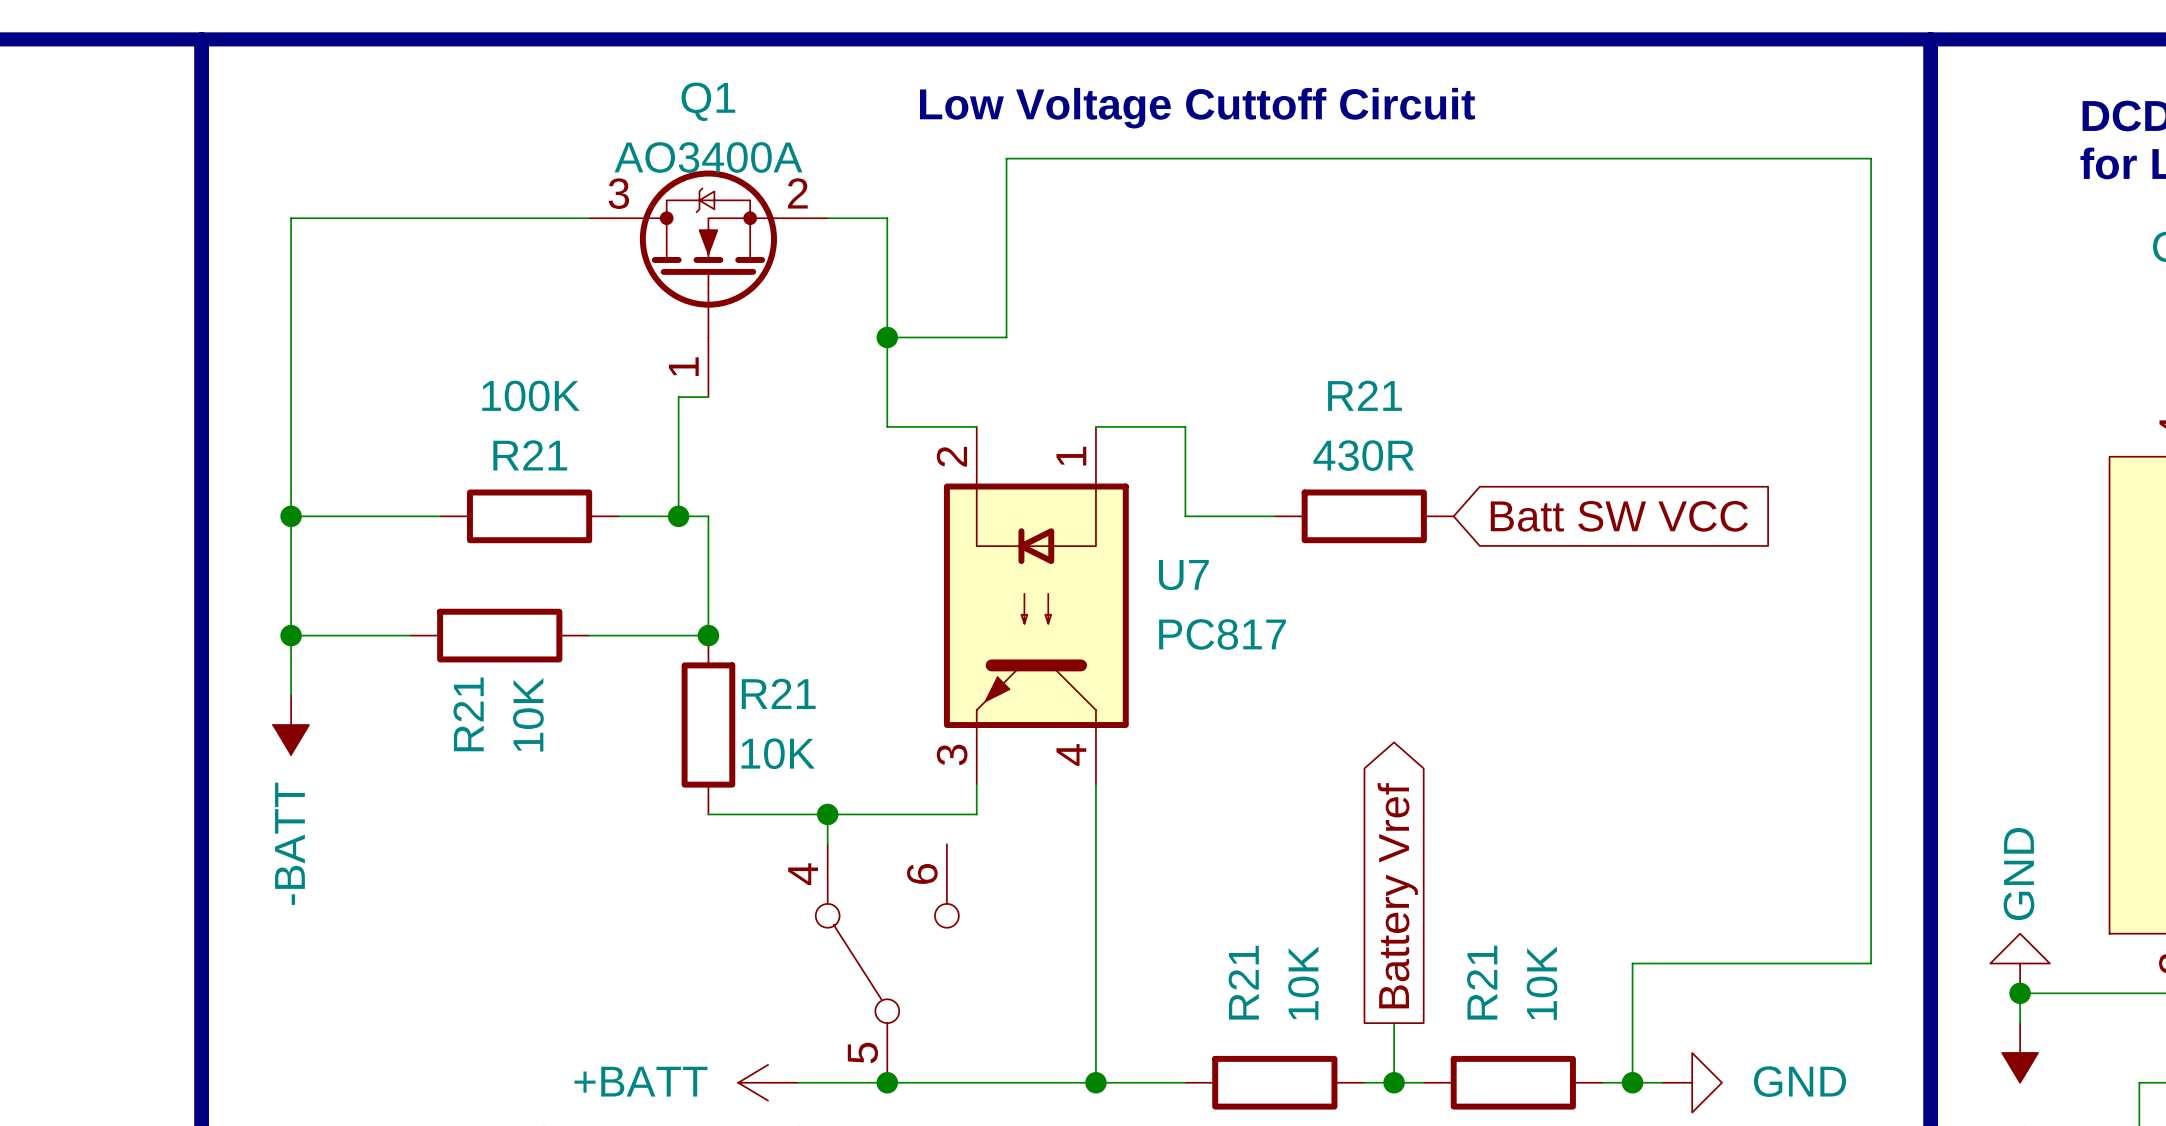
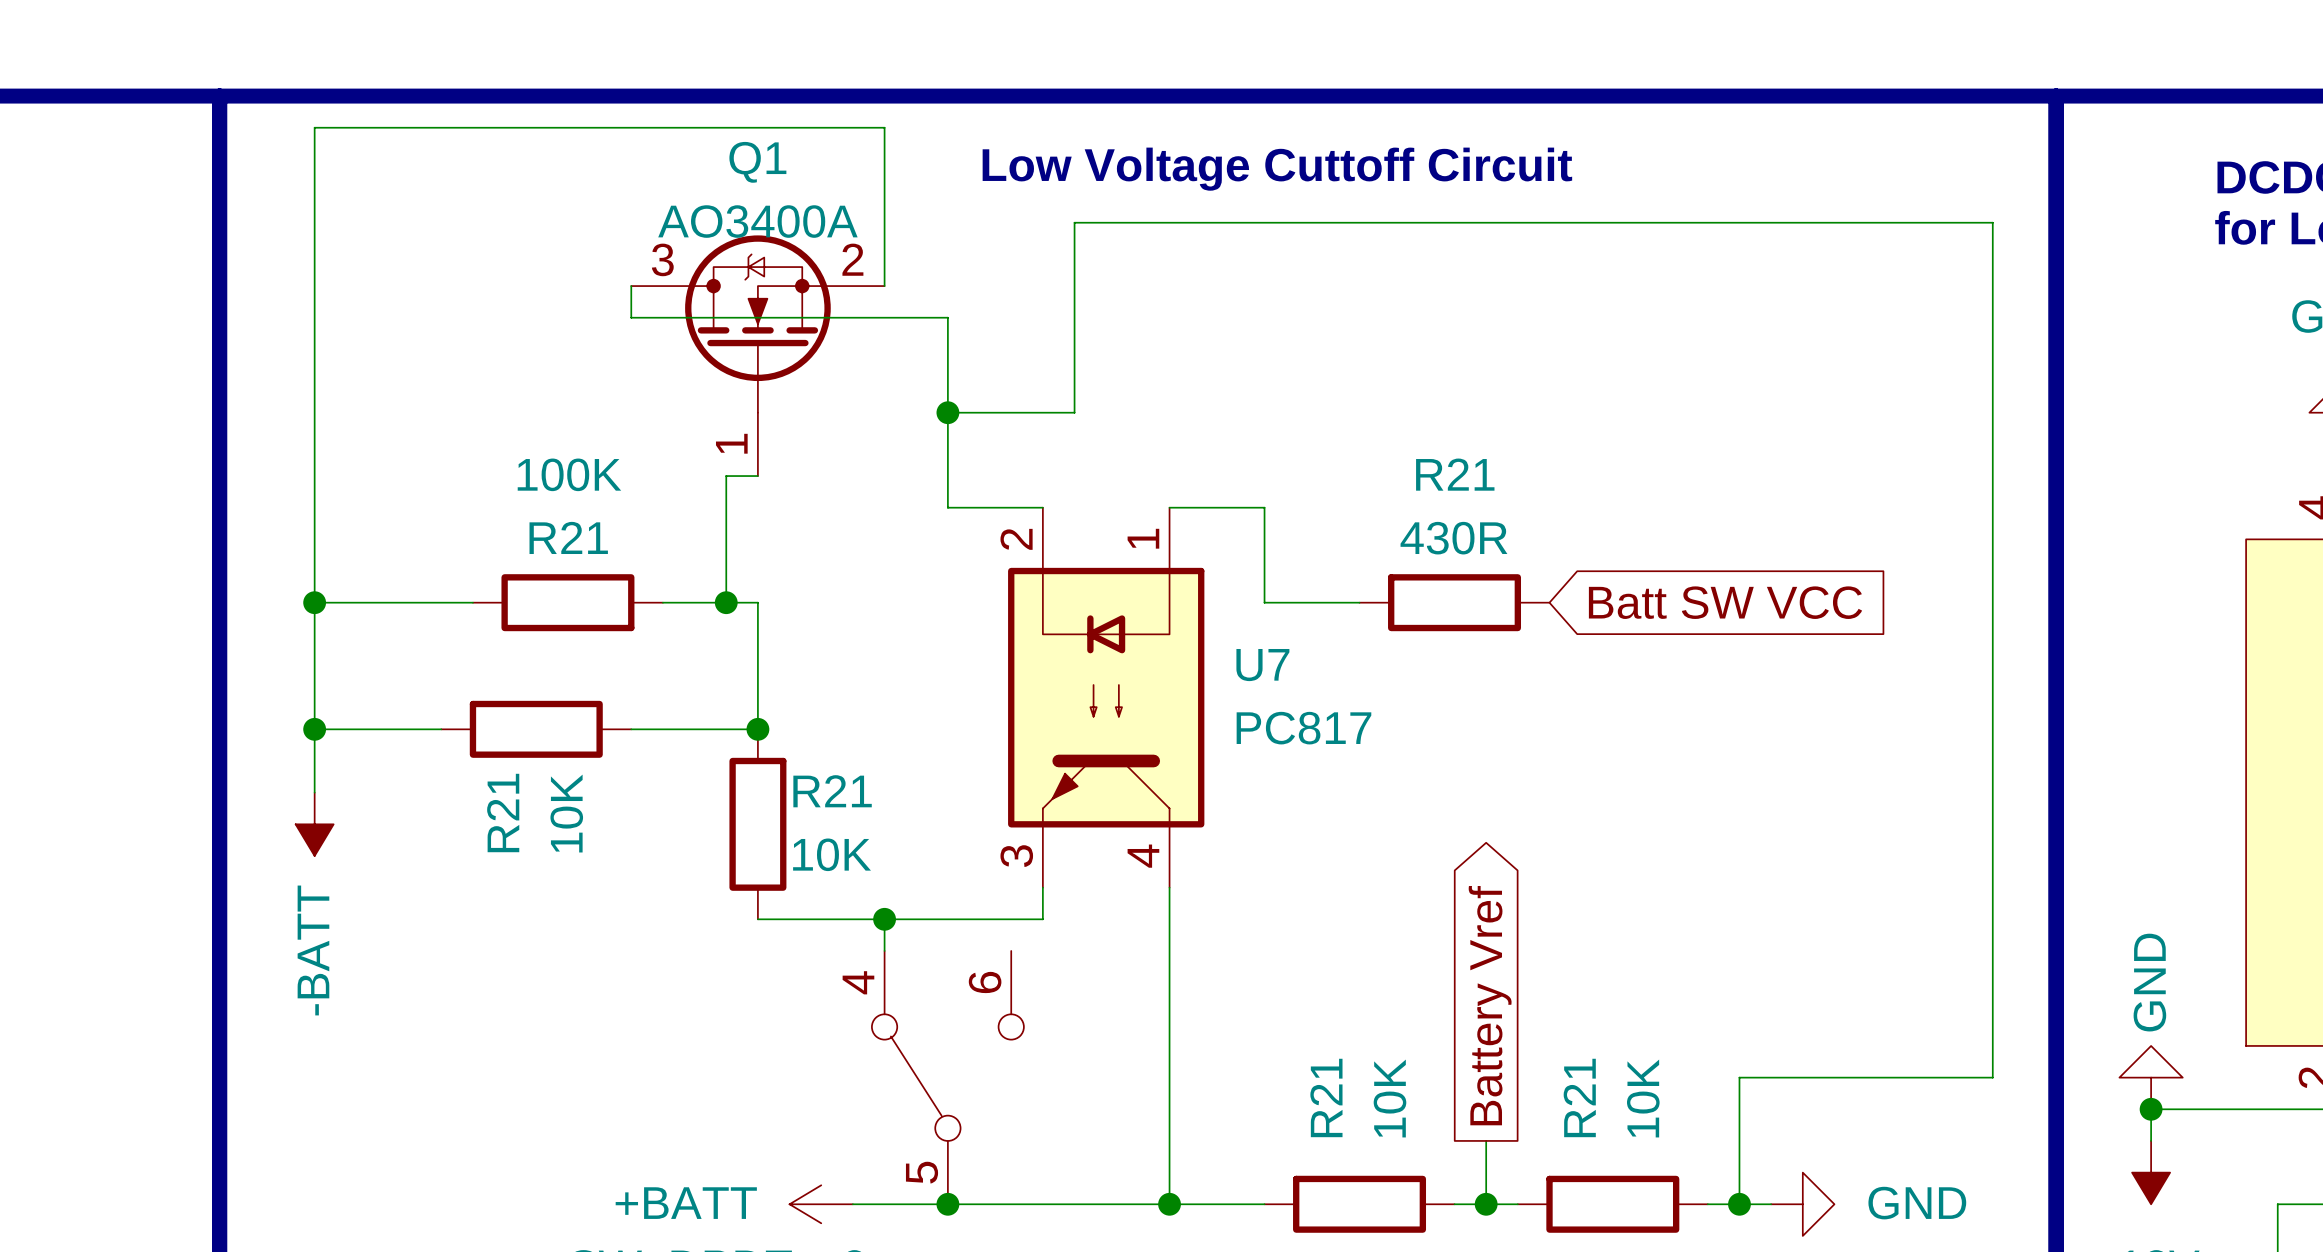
wire: (291, 218) (589, 218) -> (314, 286) (314, 127) (884, 127) (884, 286)
wire: (827, 218) (887, 218) (887, 248) -> (631, 286) (631, 317) (947, 317)

